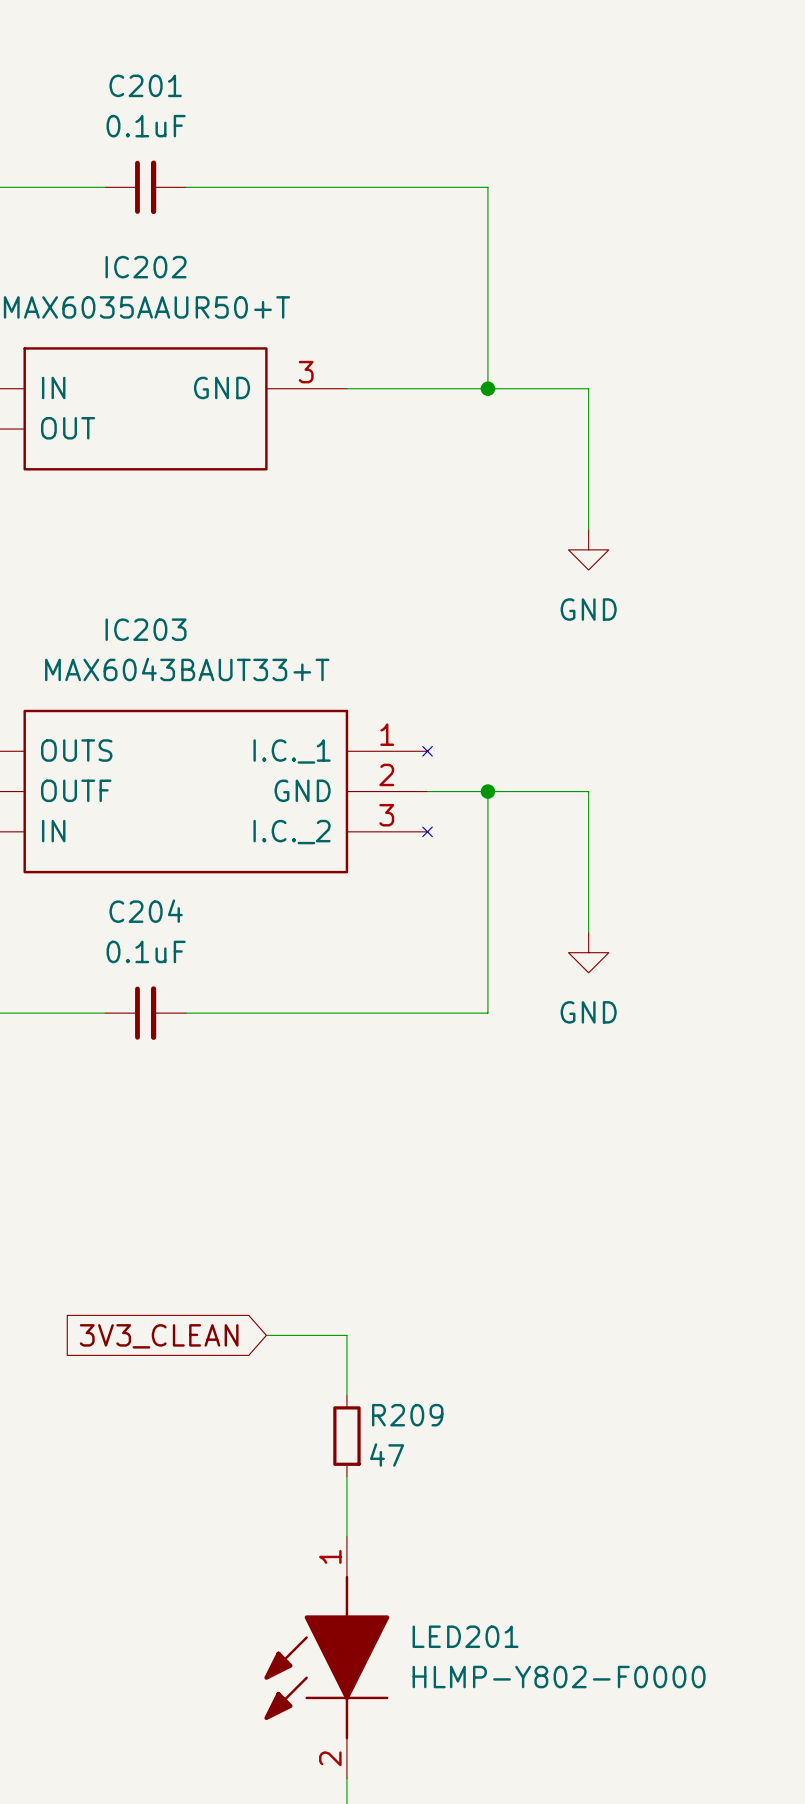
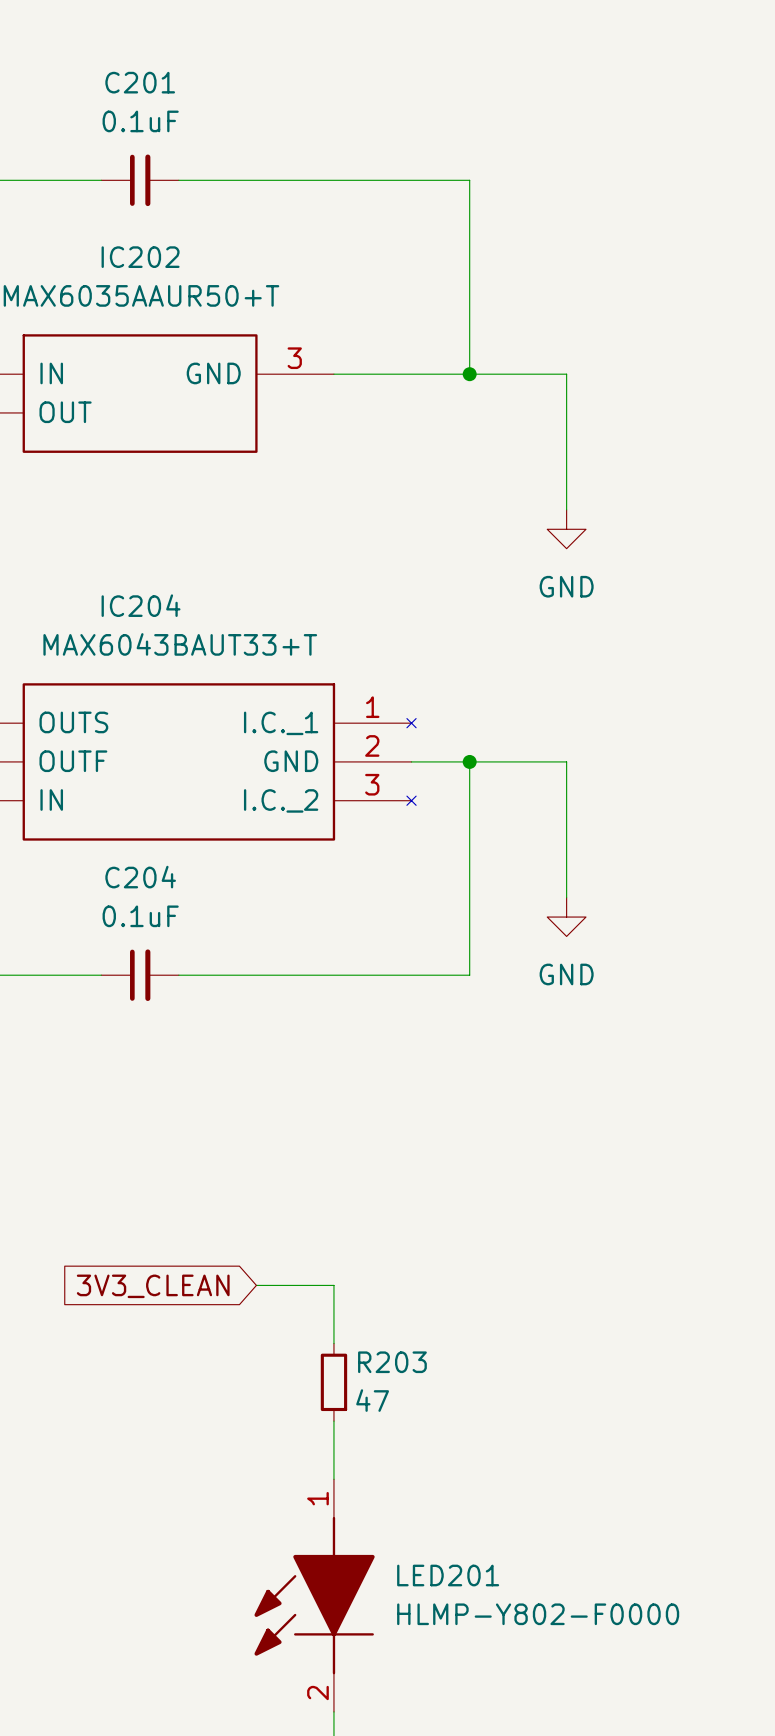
IC203 name: IC203 (146, 629) -> IC204 (141, 605)
R209 name: R209 (407, 1415) -> R203 (392, 1362)

